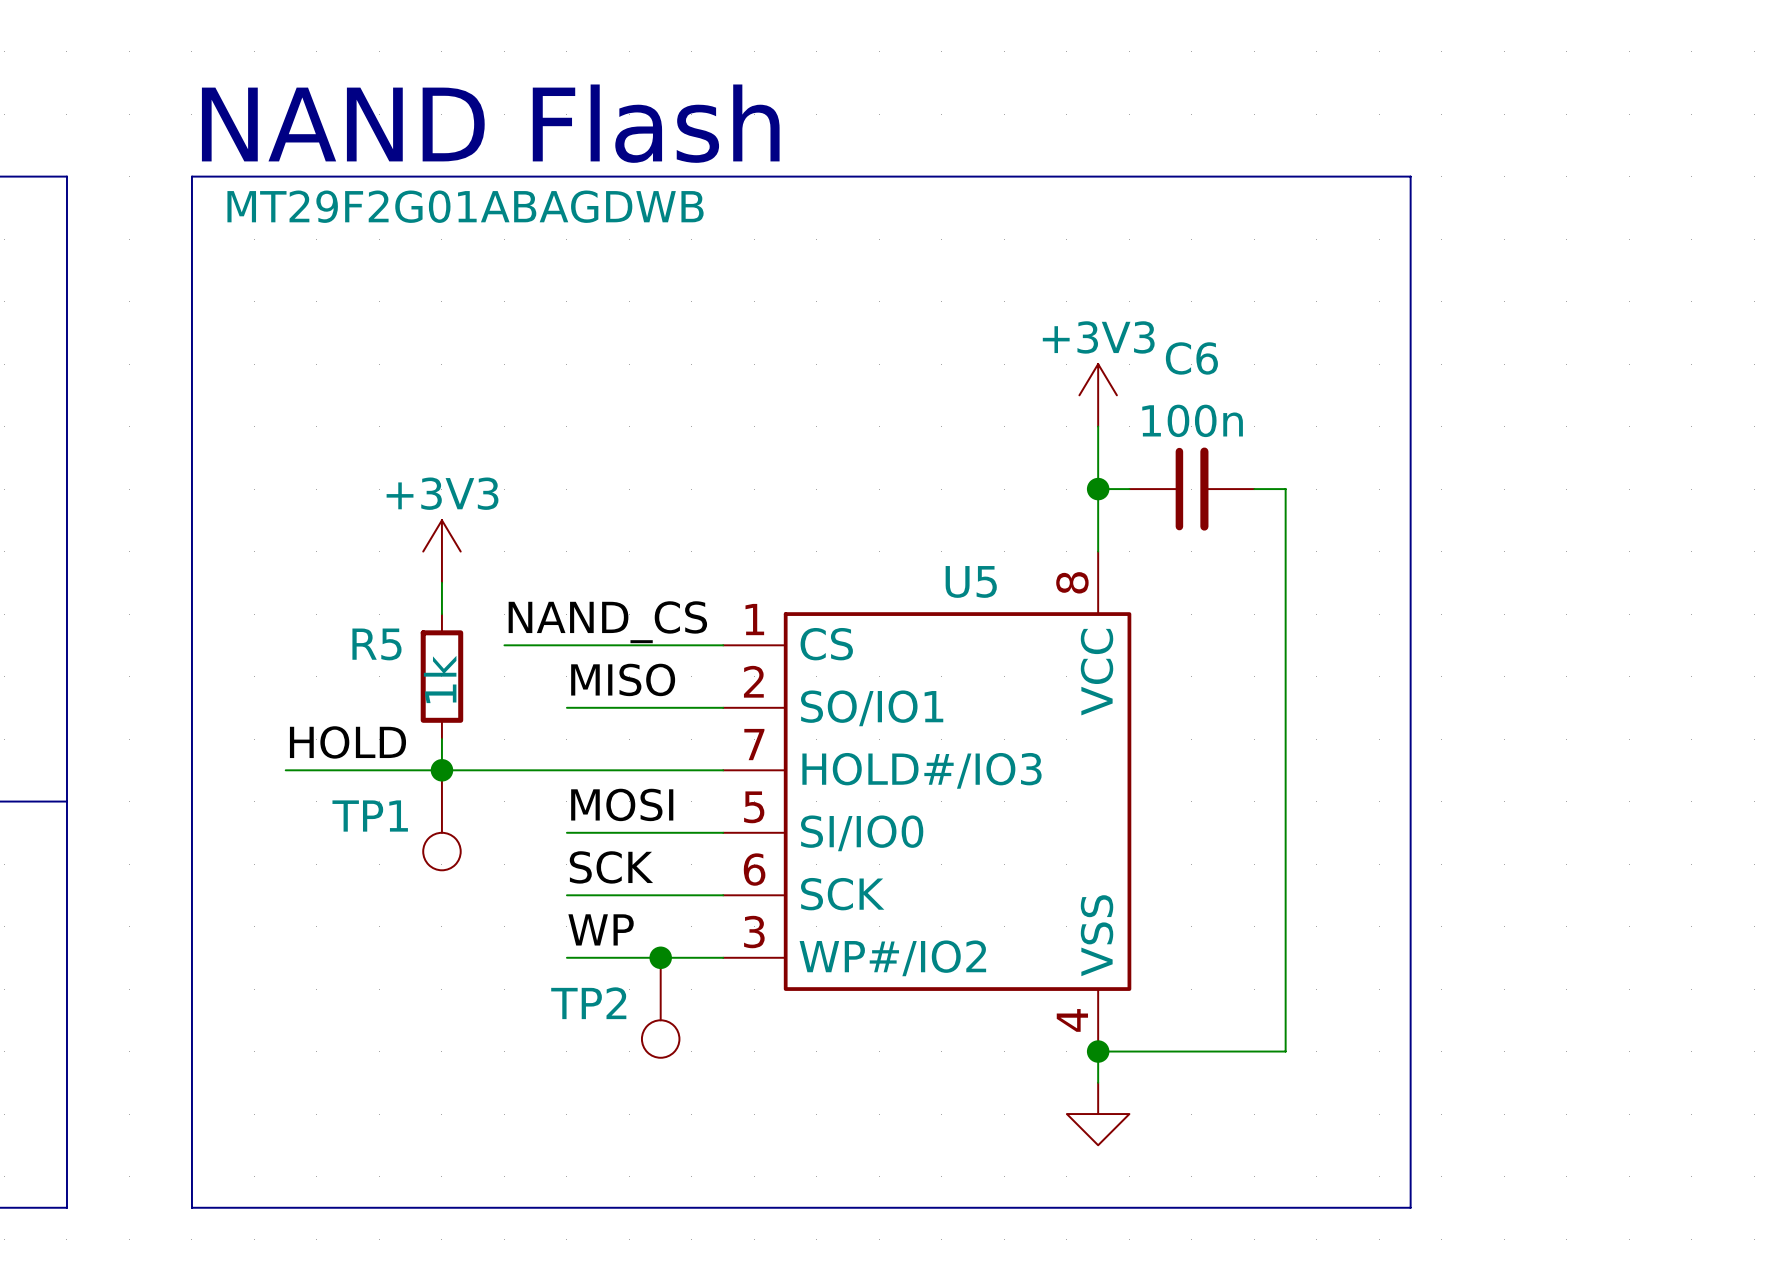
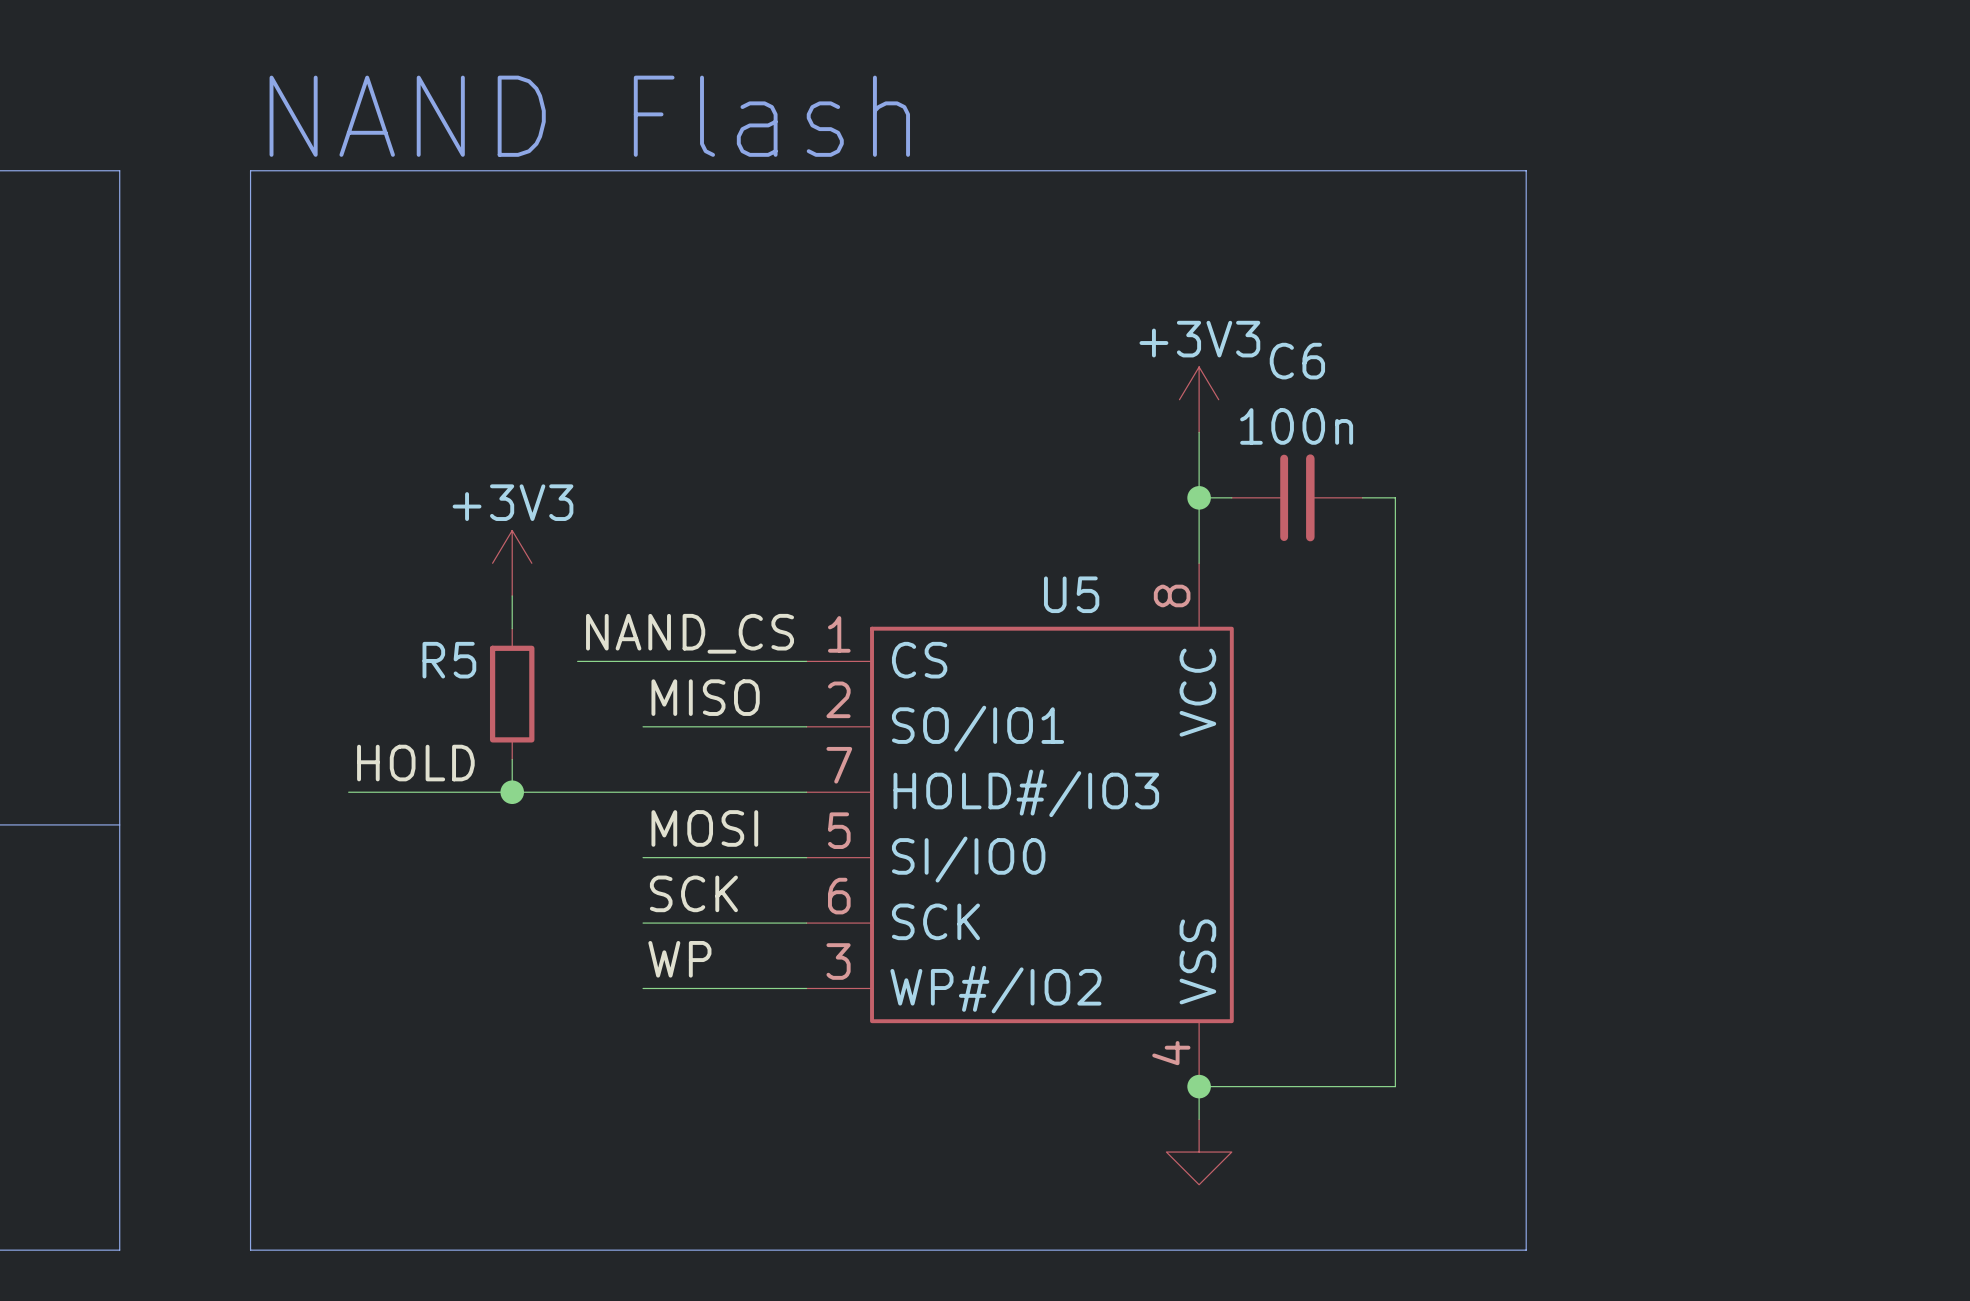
U5 value: MT29F2G01ABAGDWB (465, 206) -> none
R5 value: 1k (440, 679) -> none
TP1: (441, 820) -> none
junction: (660, 957) -> none
TP2: (660, 1007) -> none

